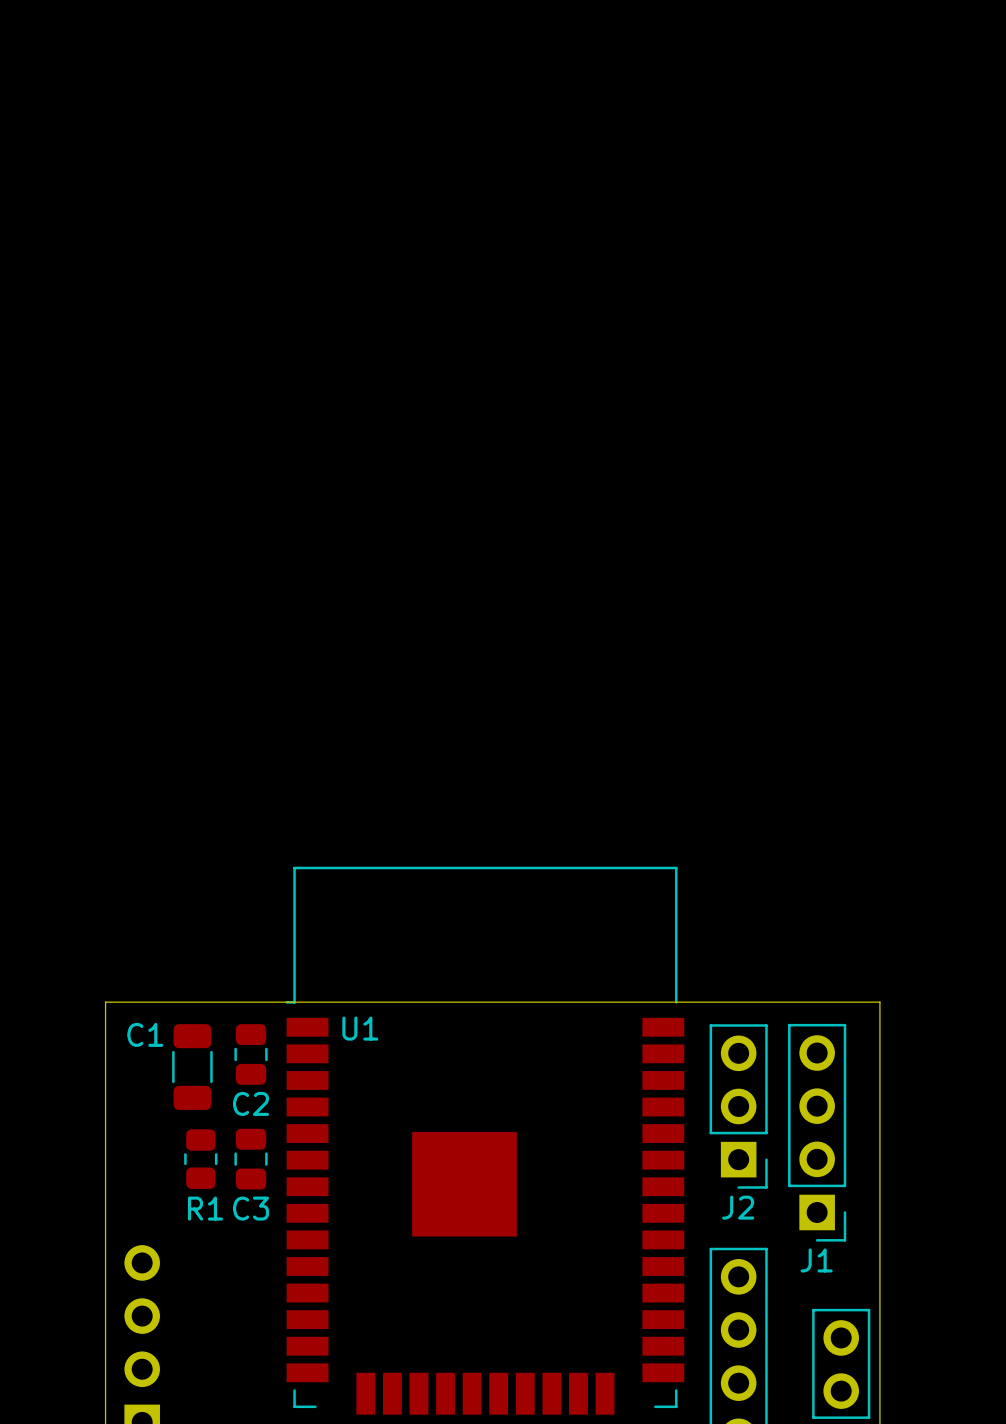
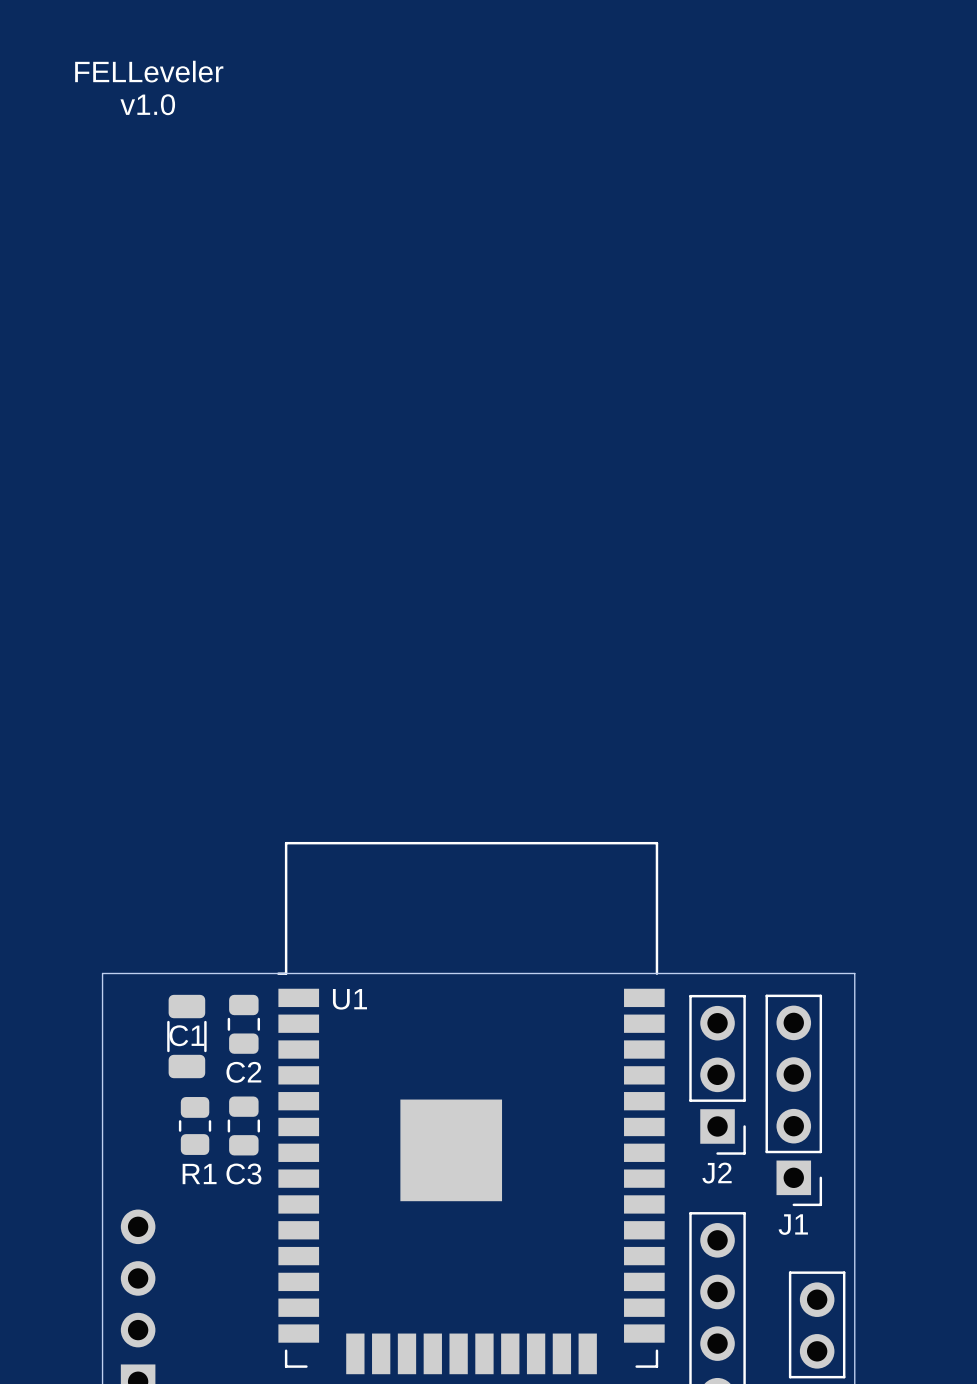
text: none -> FELLeveler (149, 71)
text: none -> v1.0 (147, 104)
C1 name position: C1 (145, 1034) -> C1 (186, 1035)

